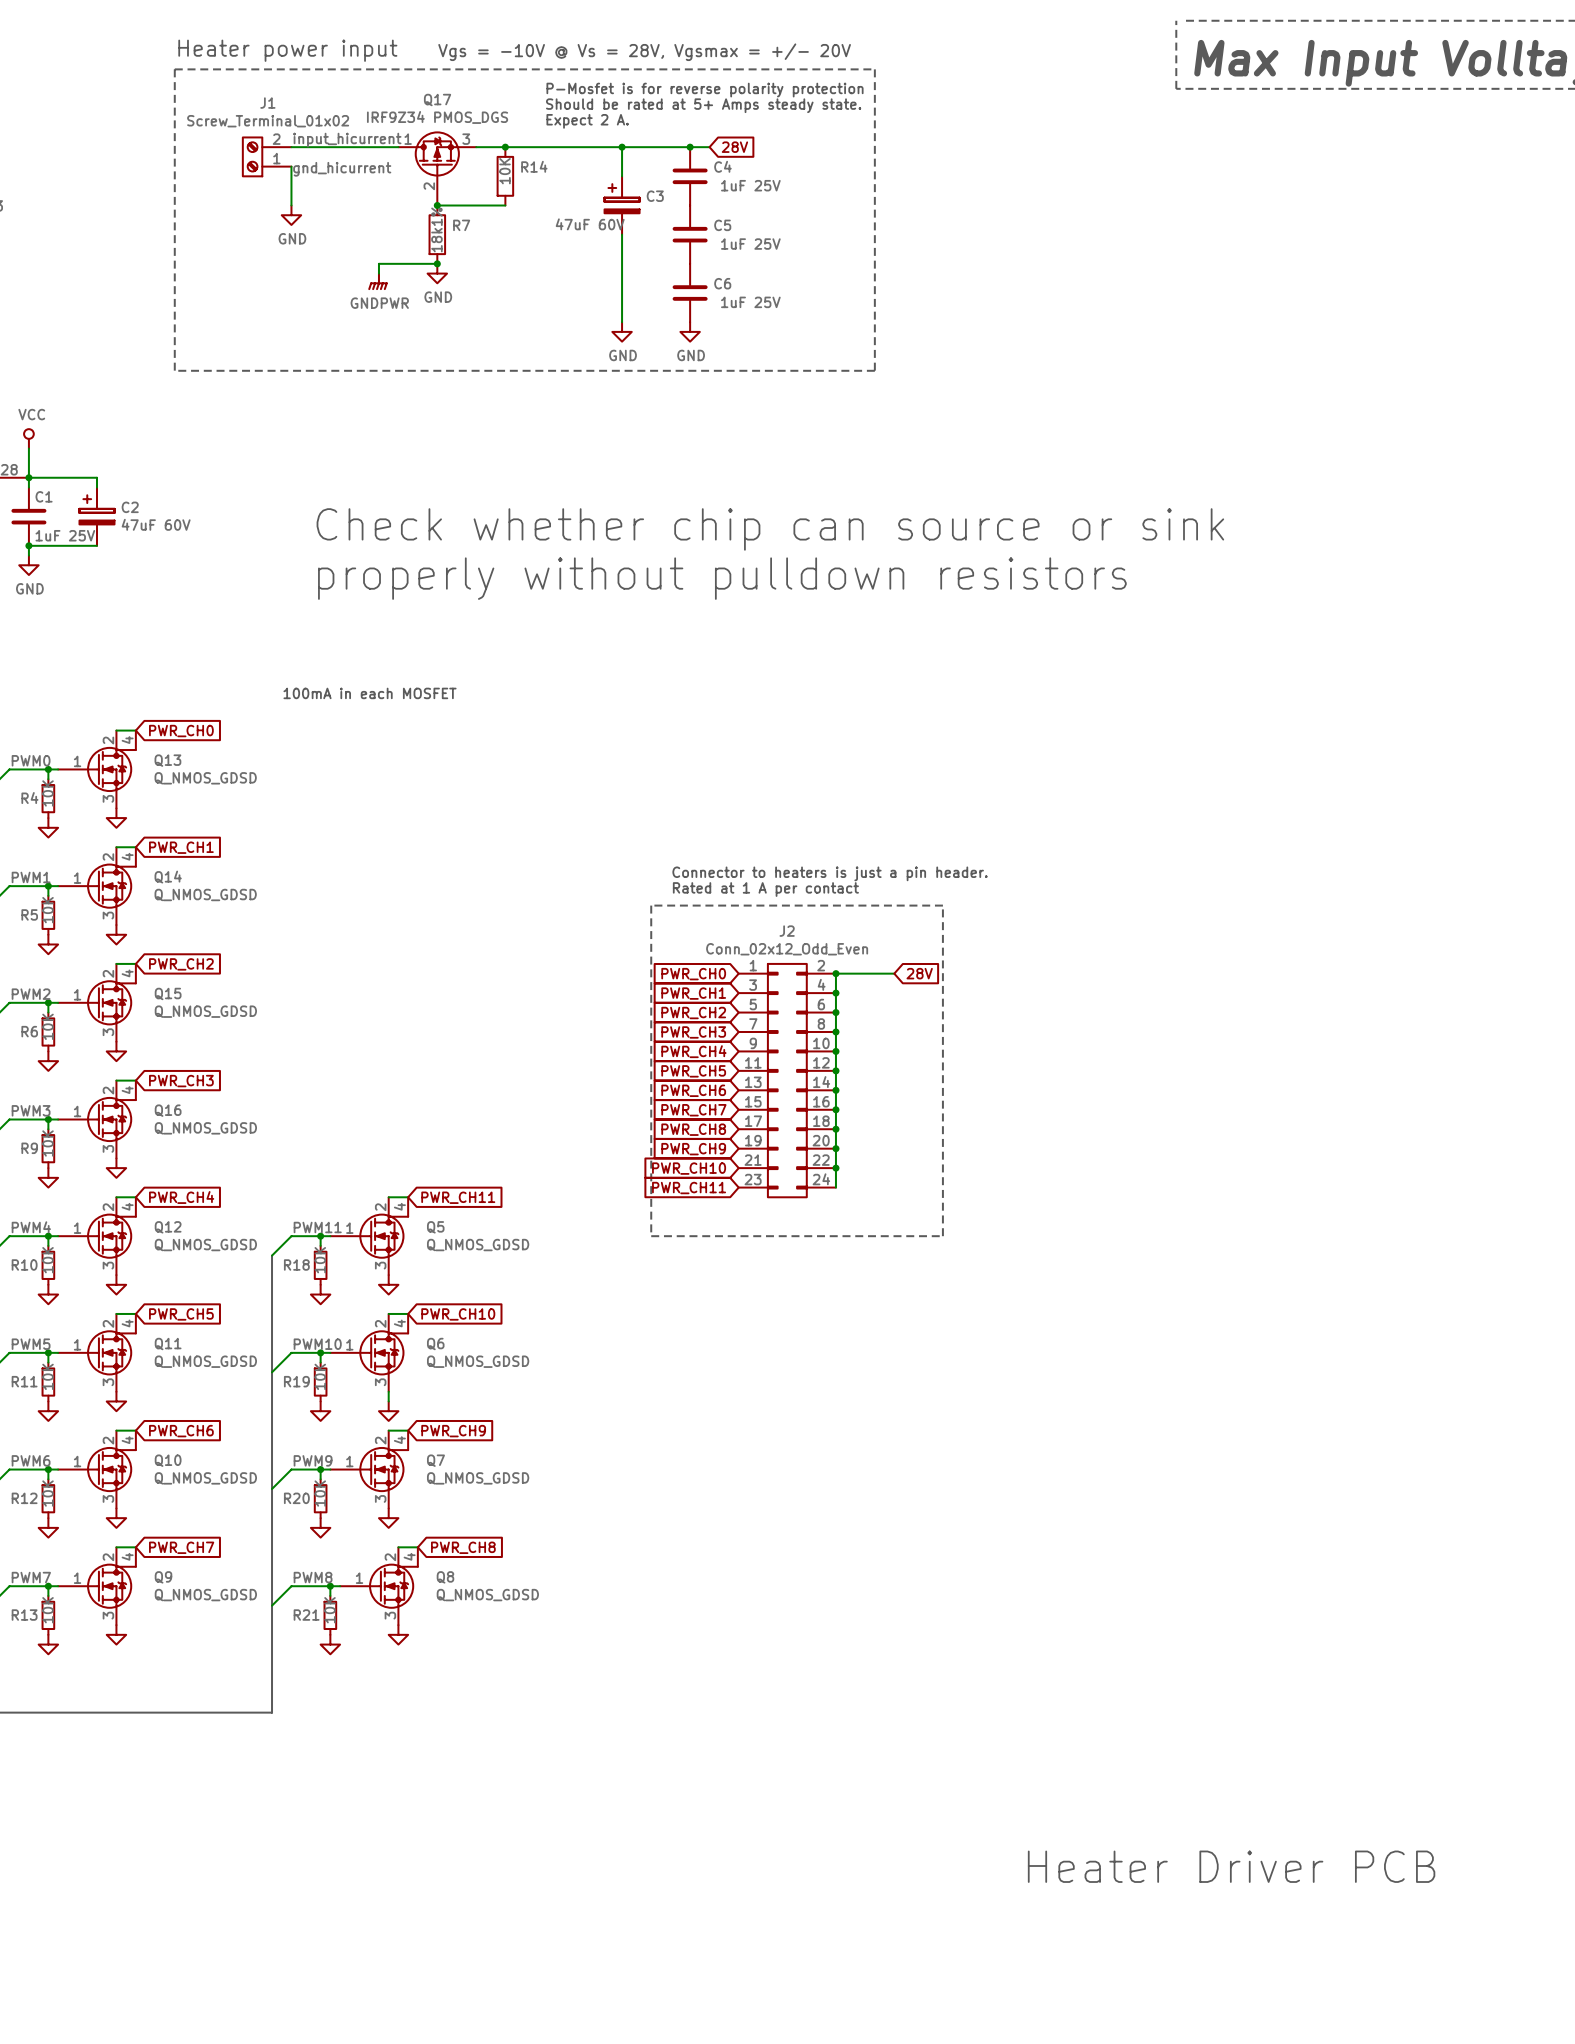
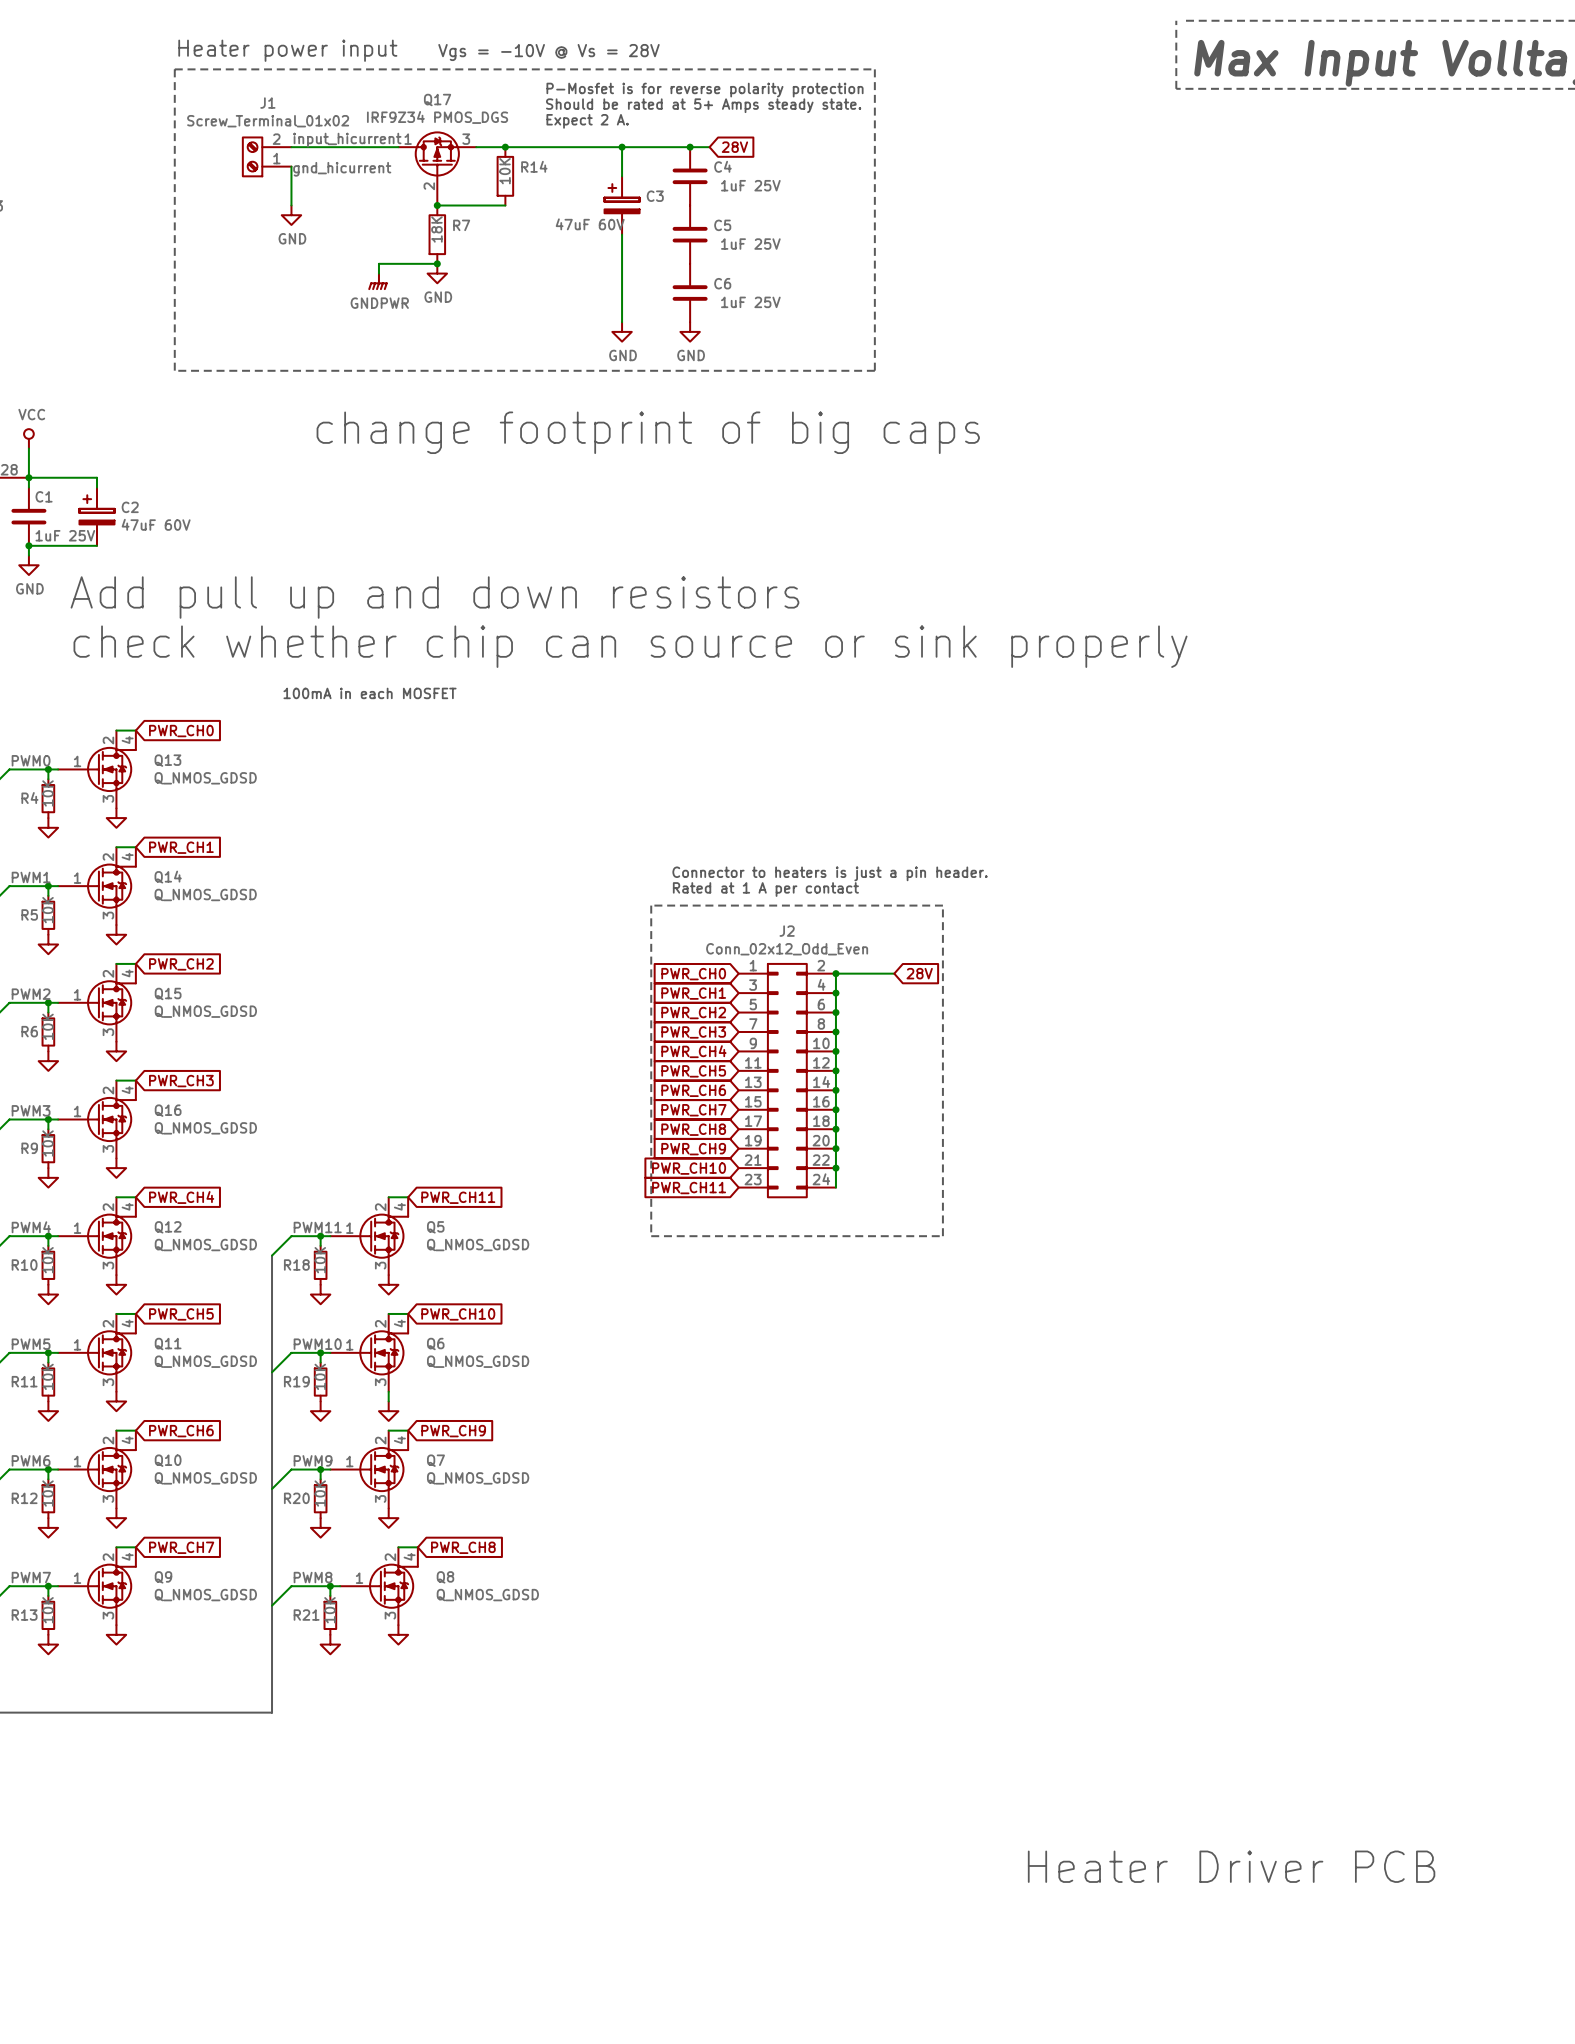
text: Vgs = -10V @ Vs = 28V, Vgsmax = +/- 20V (644, 52) -> Vgs = -10V @ Vs = 28V (548, 52)
R7 value: 18k1% (436, 229) -> 18K (436, 229)
text: none -> change footprint of big caps (648, 432)
text: Check whether chip can source or sink (770, 529) -> none
text: properly without pulldown resistors (722, 578) -> none
text: none -> Add pull up and down resistors (434, 597)
text: none -> check whether chip can source or sink properly (630, 646)

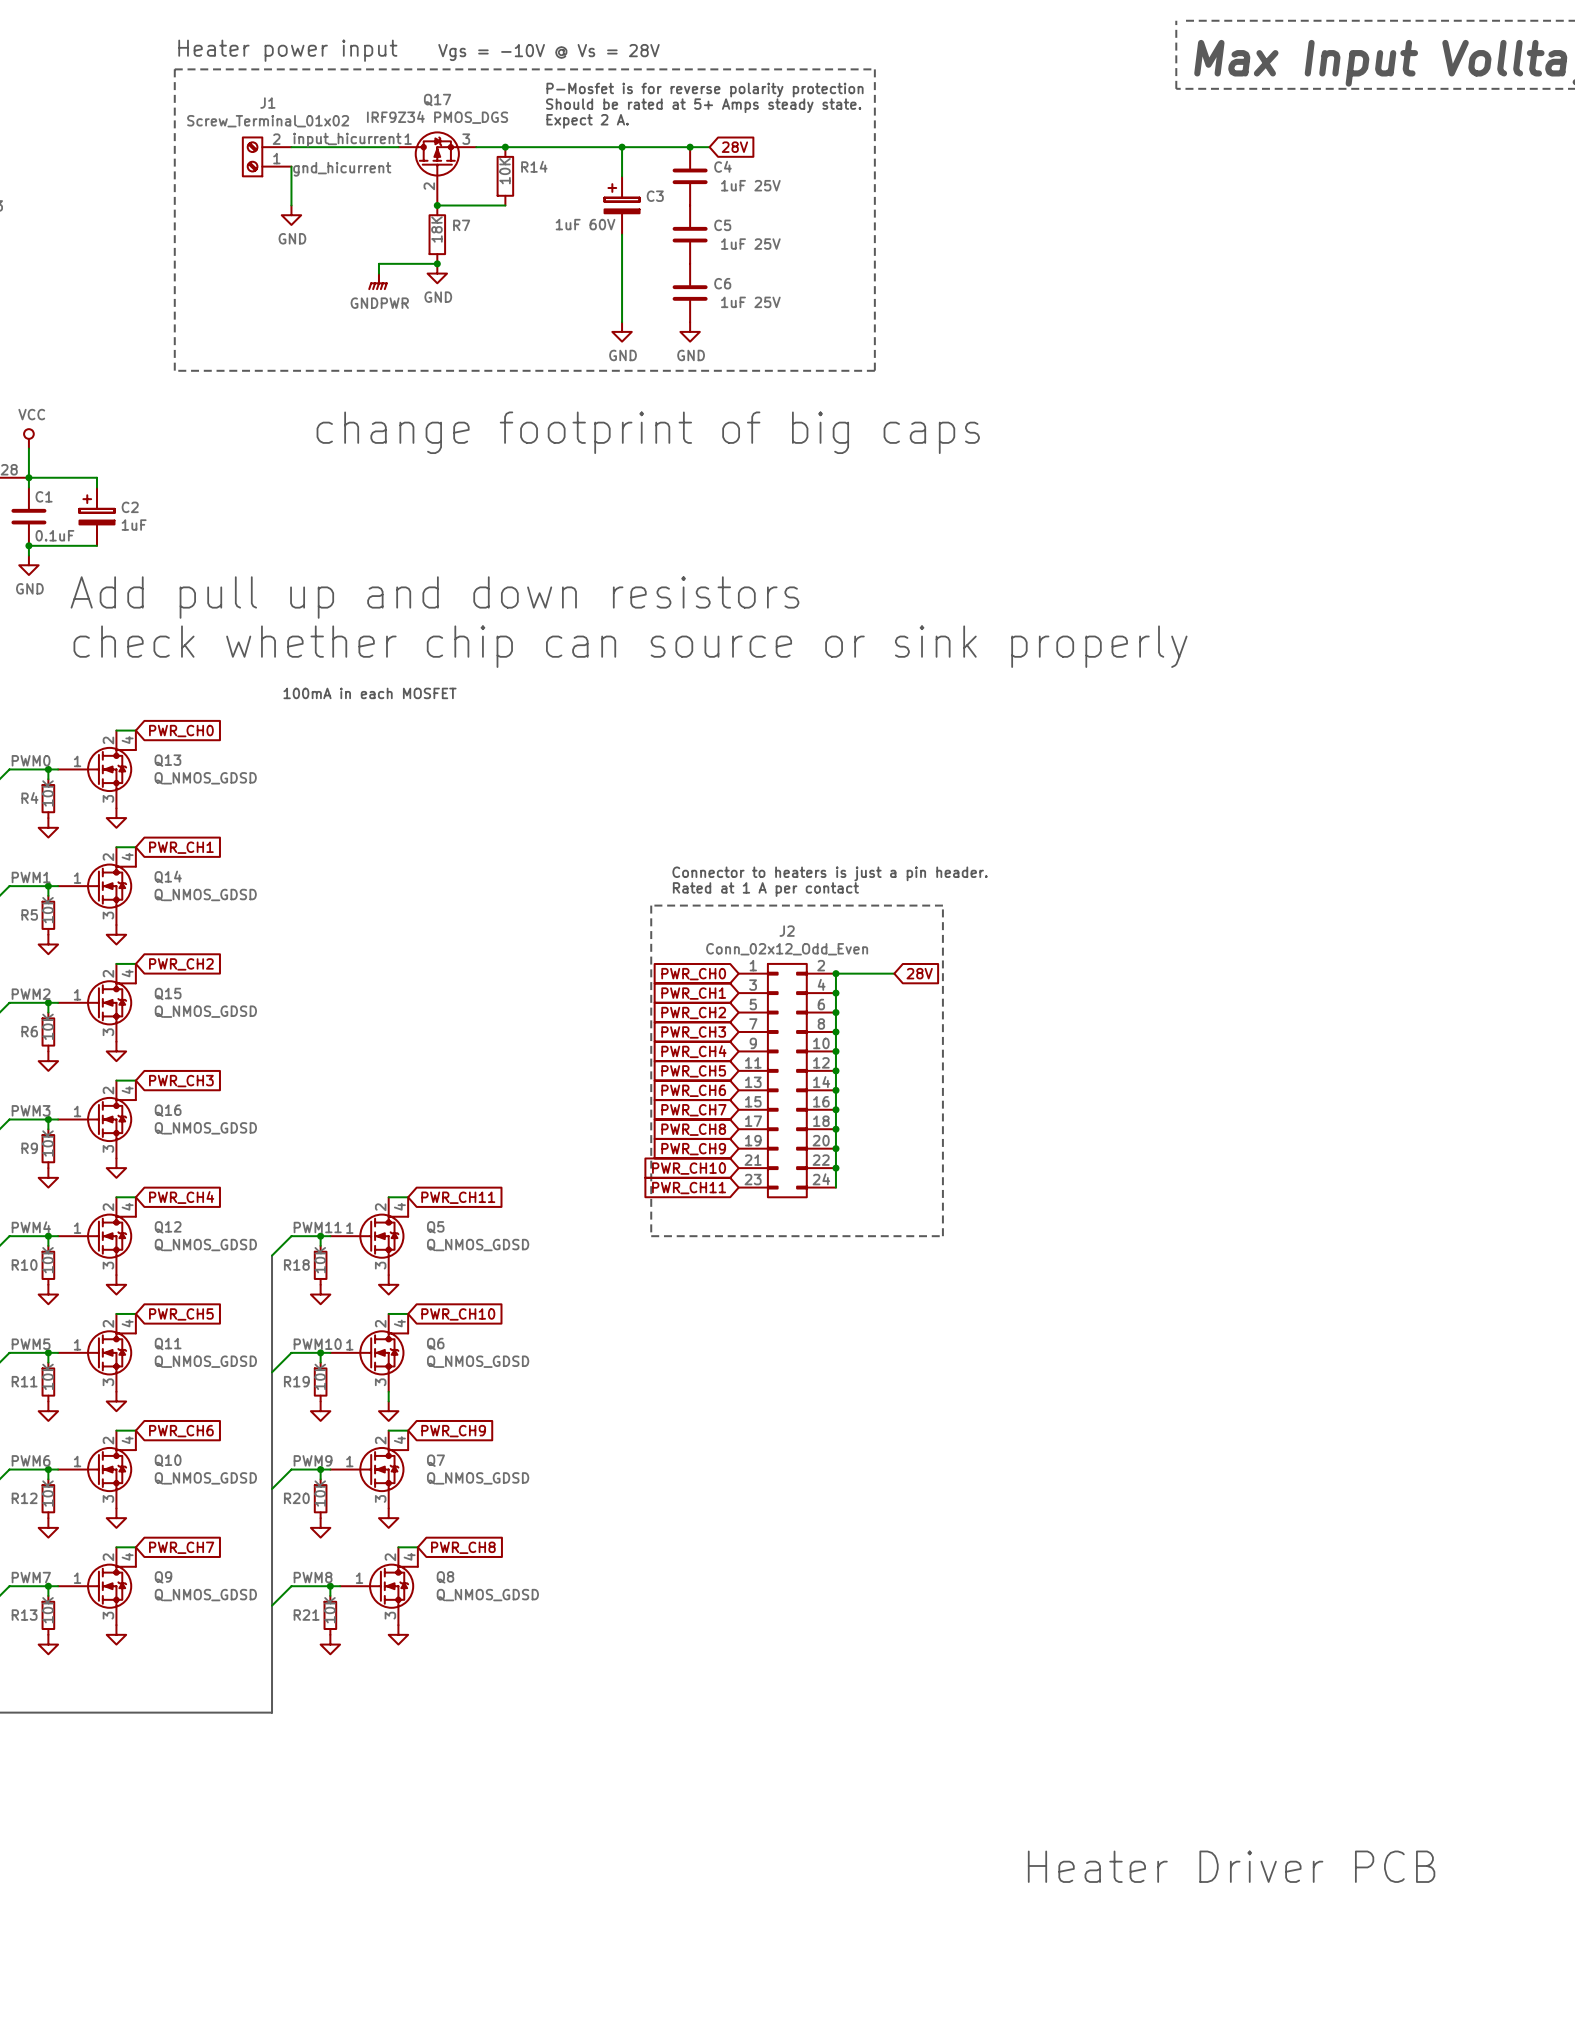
C3 value: 47uF 60V (590, 224) -> 1uF 60V (585, 224)
C2 value: 47uF 60V (156, 524) -> 1uF (134, 525)
C1 value: 1uF 25V (65, 535) -> 0.1uF (54, 535)

